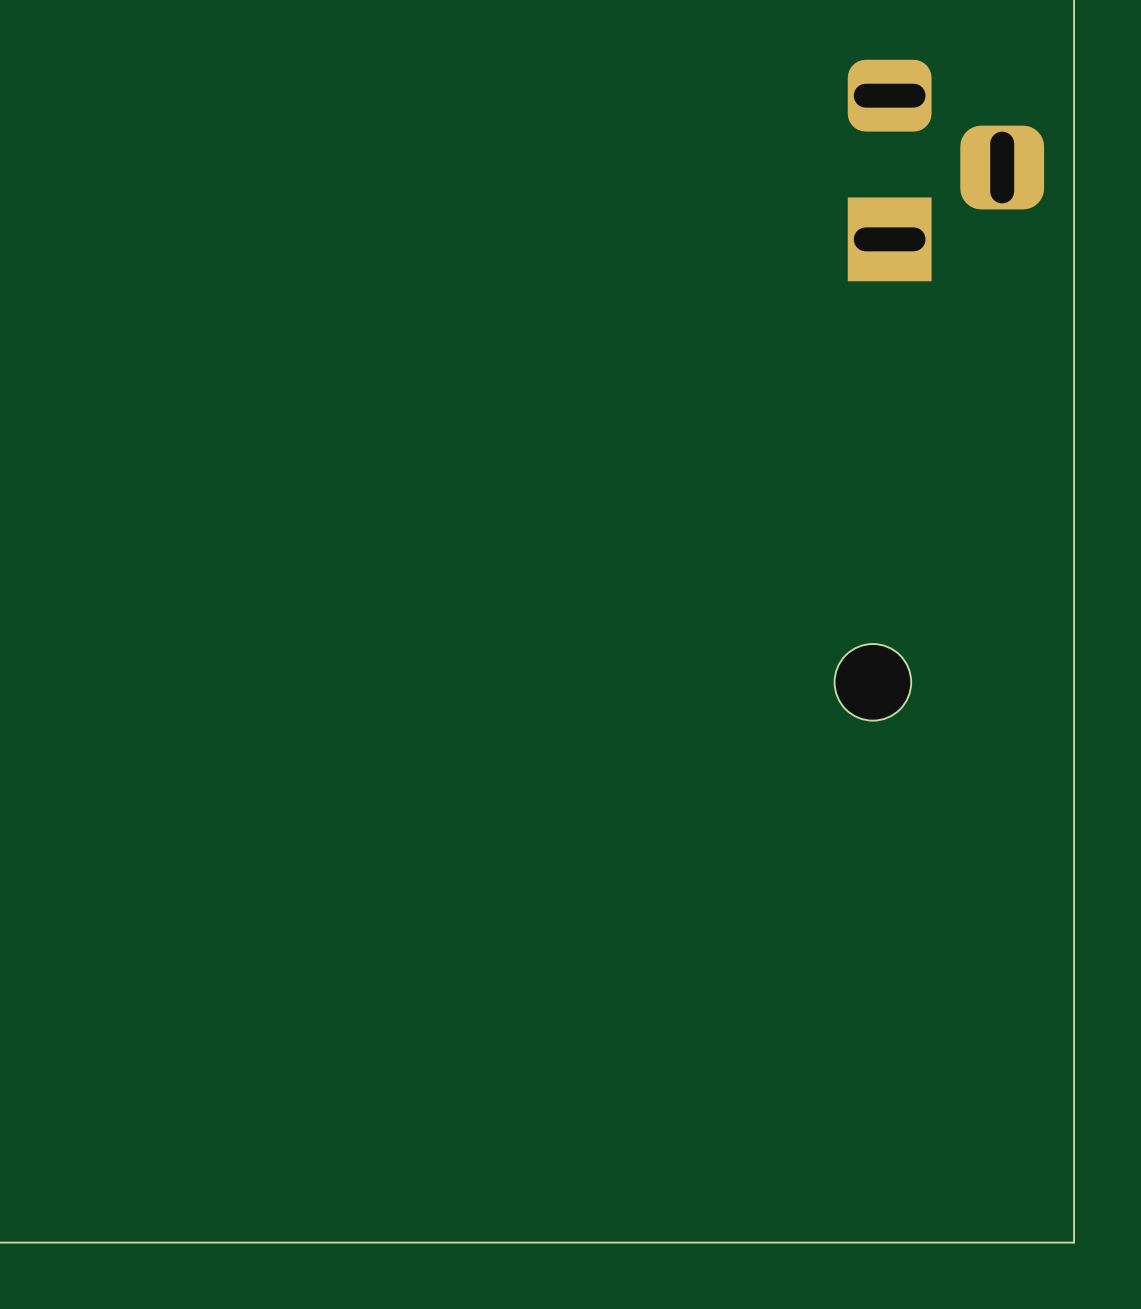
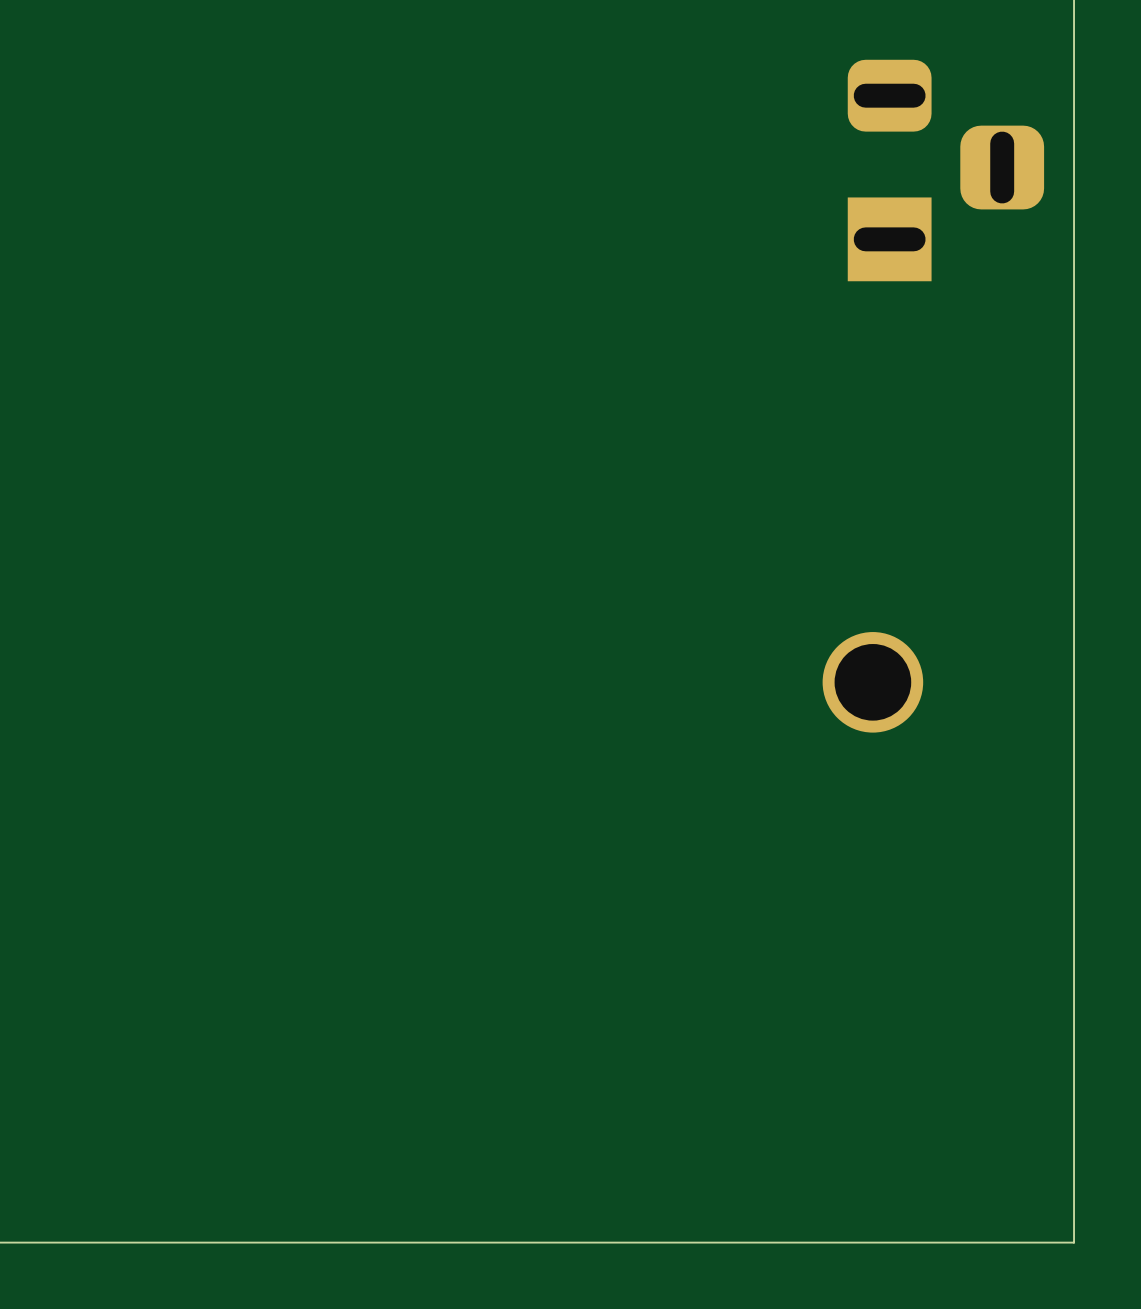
part footprint: [834, 644, 912, 721] -> [822, 632, 924, 733]

